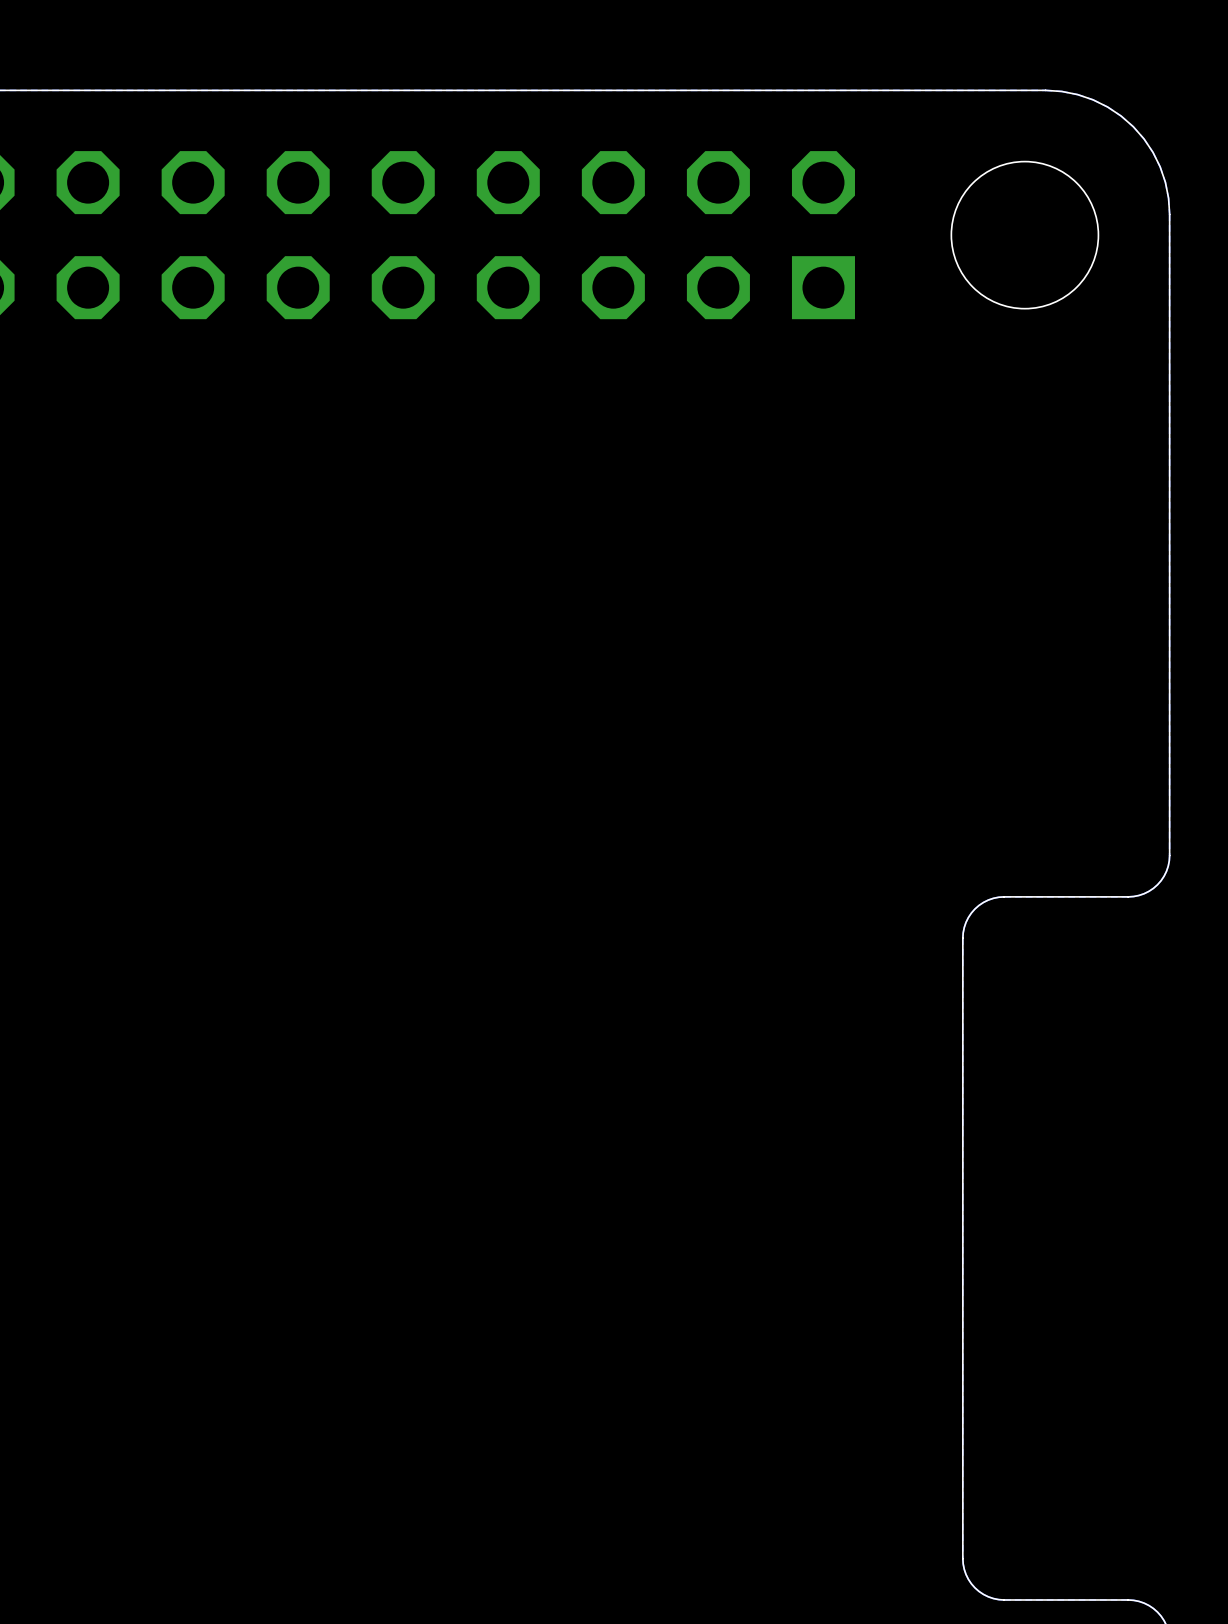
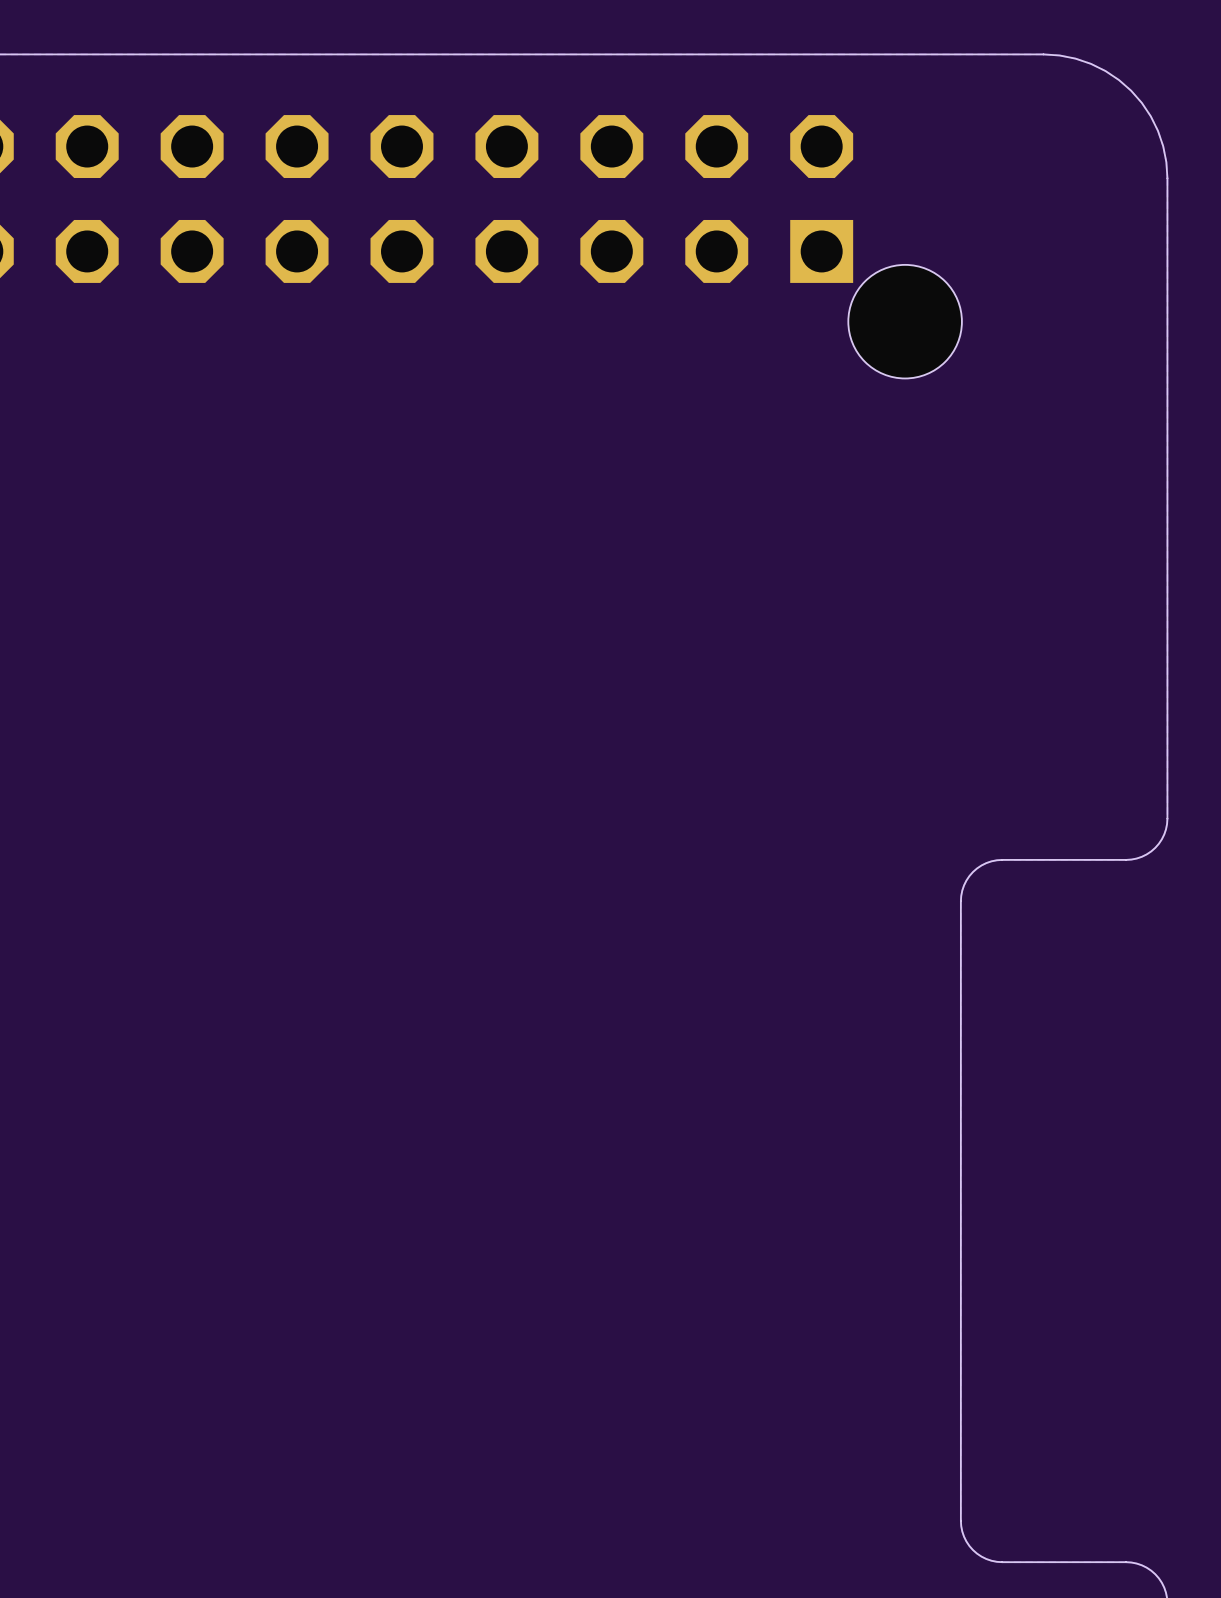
drawing: [950, 161, 1099, 310] -> none
hole: none -> (905, 321)

